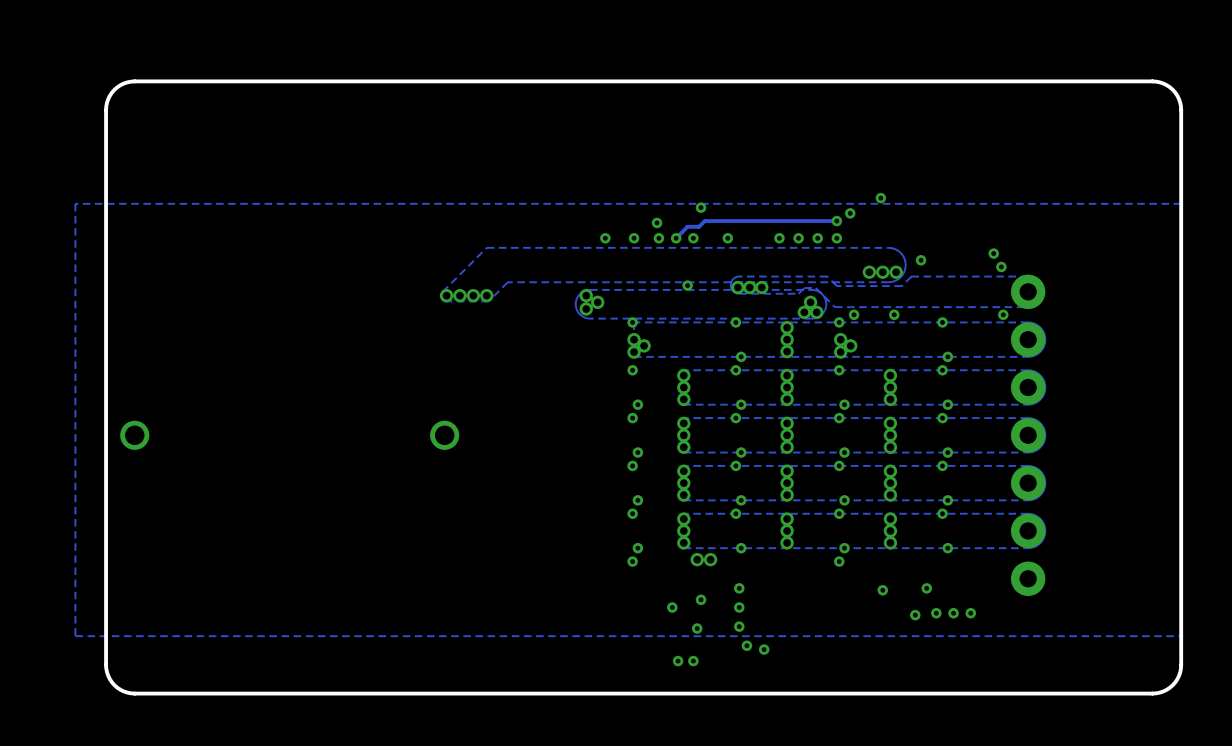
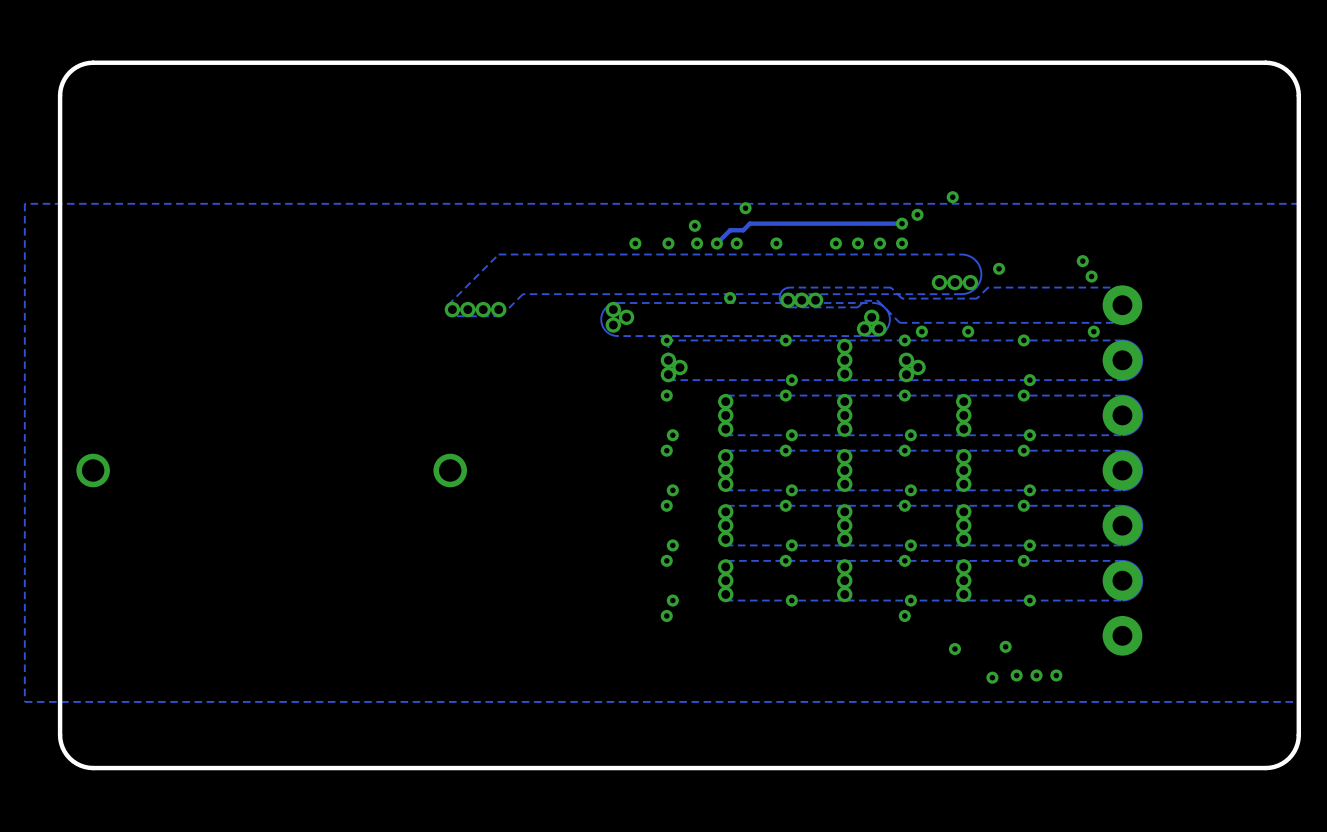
via: (697, 559) -> none
via: (710, 559) -> none
via: (739, 588) -> none
via: (701, 599) -> none
via: (672, 607) -> none
via: (739, 607) -> none
via: (739, 626) -> none
via: (697, 628) -> none
via: (746, 645) -> none
via: (764, 649) -> none
via: (678, 661) -> none
via: (693, 661) -> none

